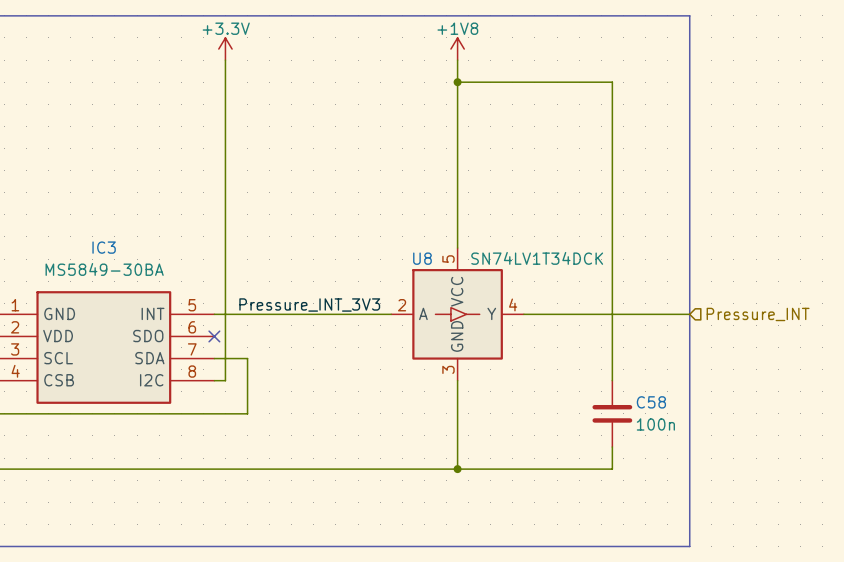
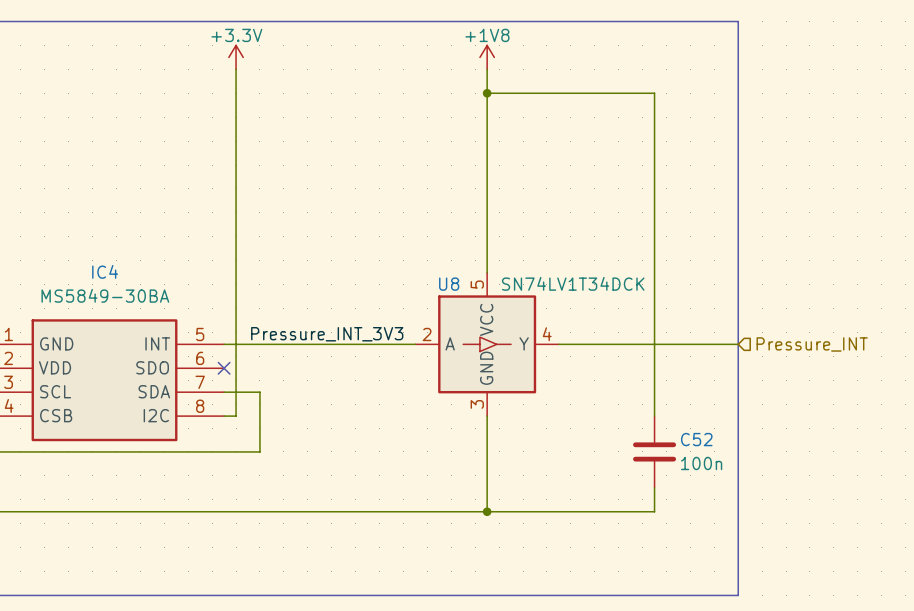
IC3 name: IC3 (104, 247) -> IC4 (105, 271)
C58 name: C58 (651, 402) -> C52 (696, 439)

